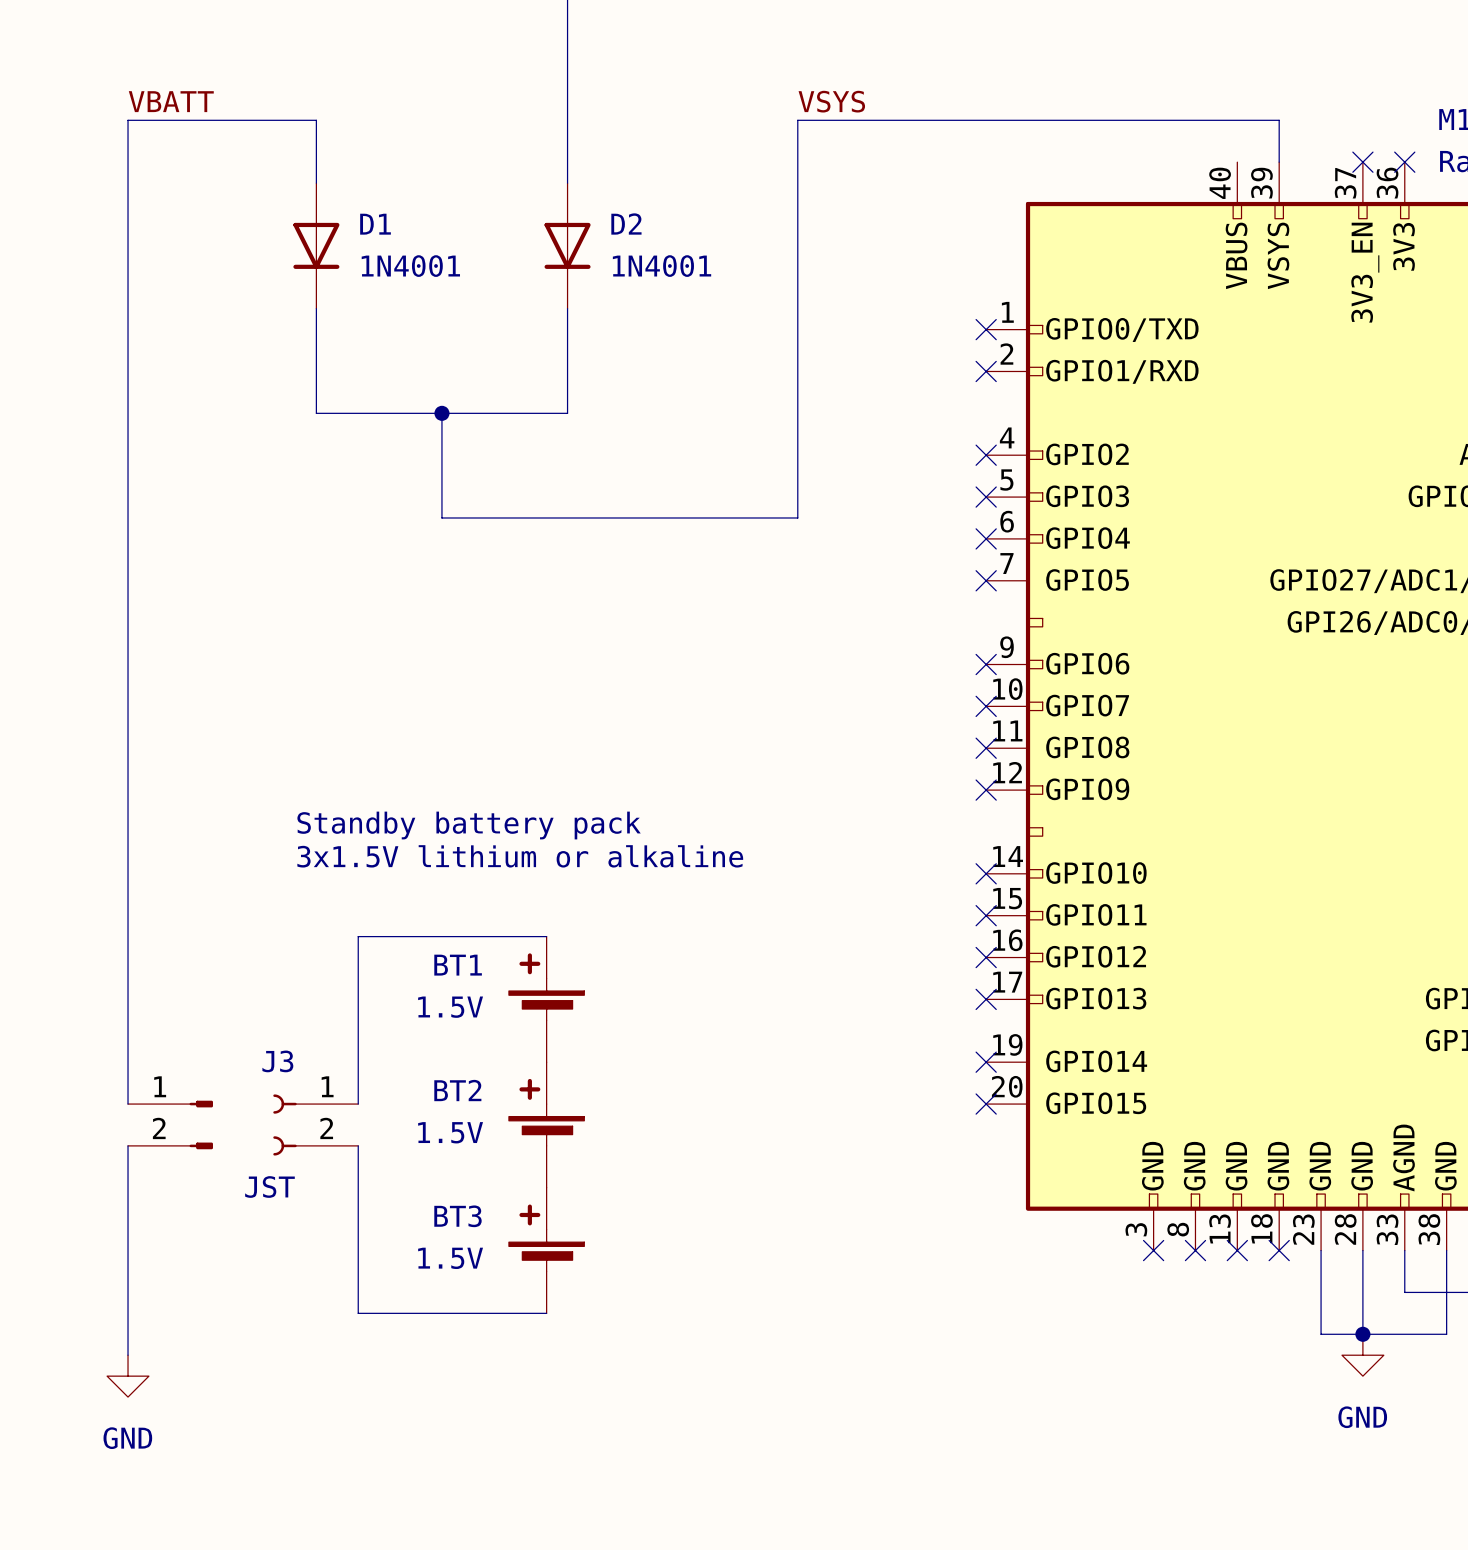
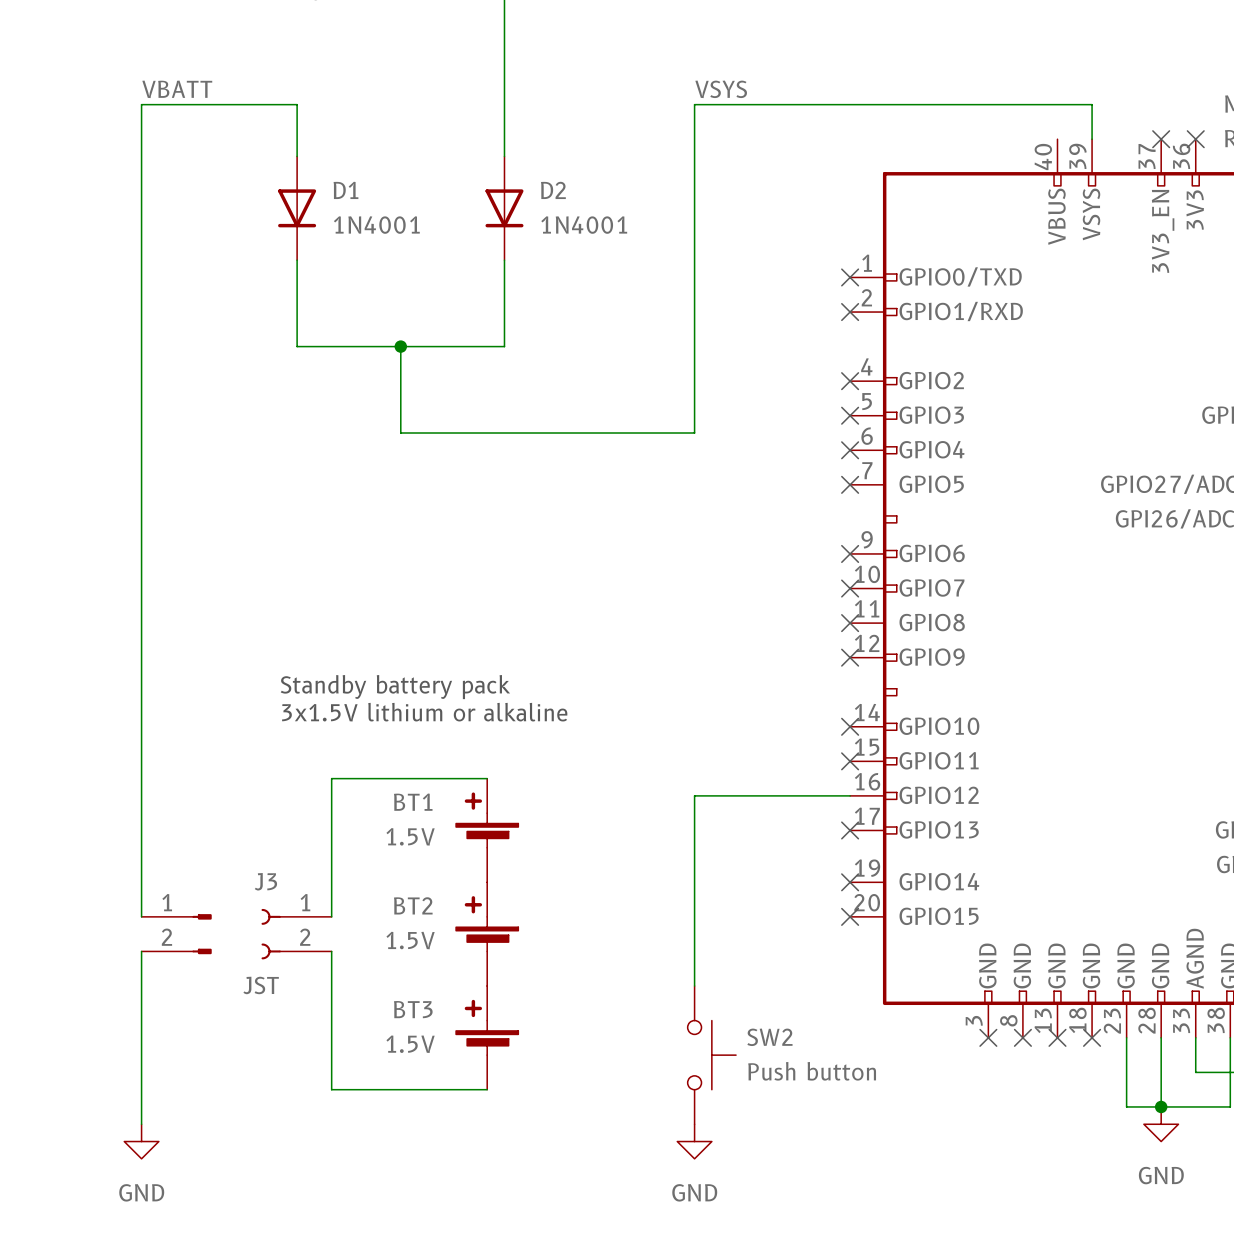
wire: none -> (850, 795) (694, 795) (694, 986)
no-connect mark: (986, 957) -> none
SW2: none -> Push button (711, 1055)
power symbol: none -> GND (694, 1141)

